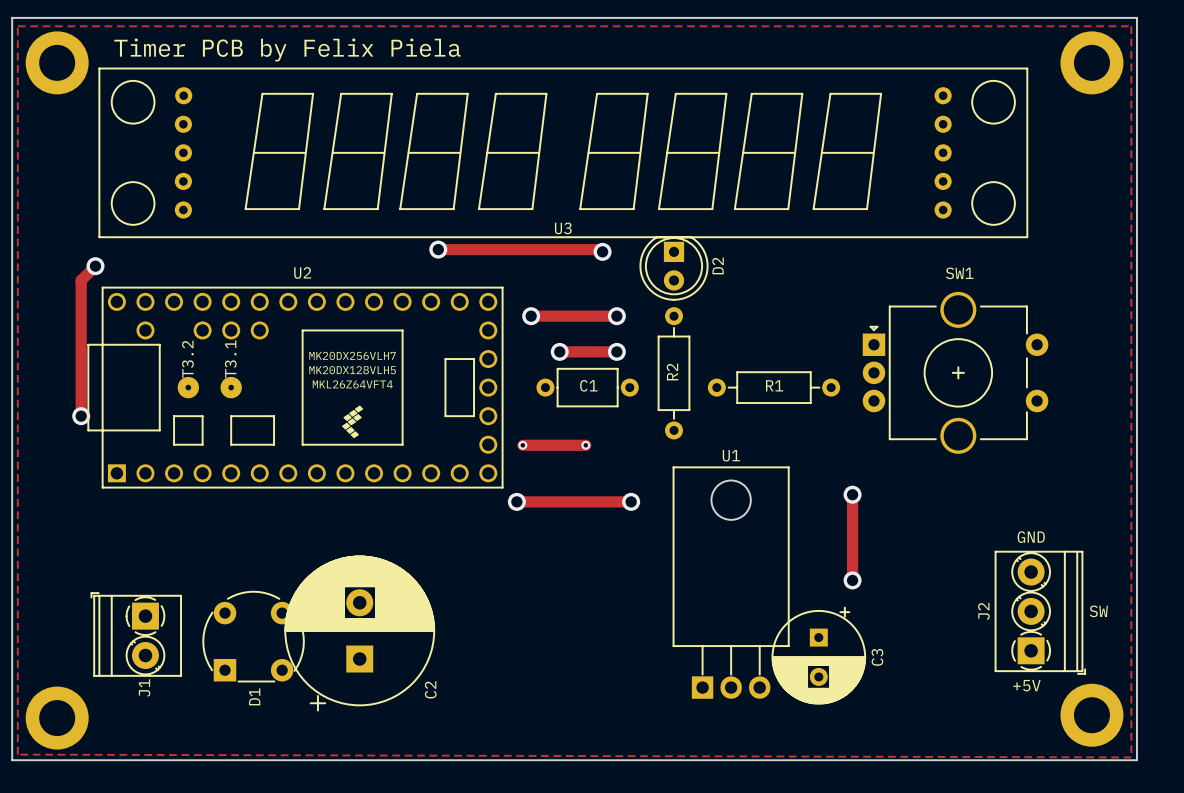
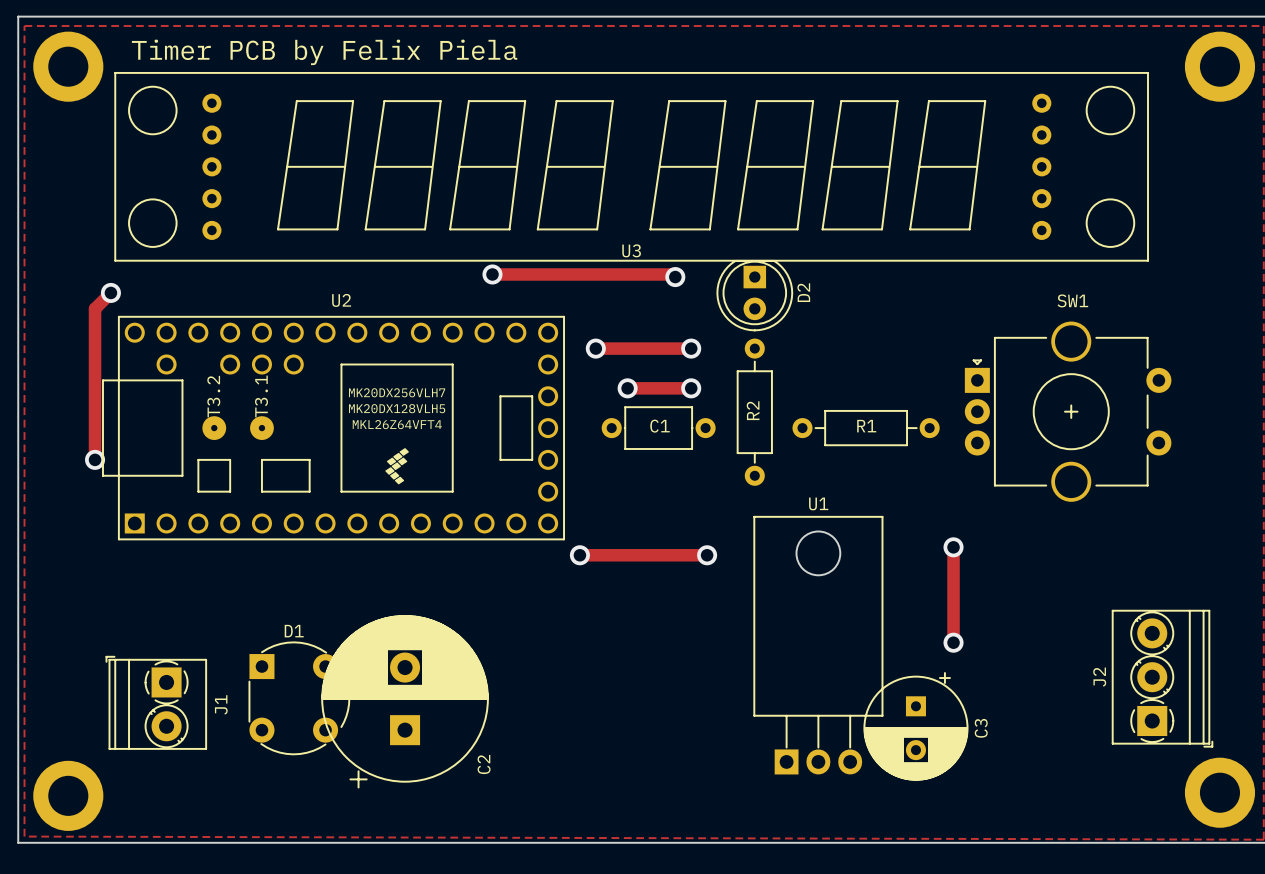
U3 footprint: [98, 67, 1028, 238] -> [114, 72, 1149, 262]
track: (522, 445) (585, 445) -> none
via: (522, 445) -> none
via: (585, 445) -> none
text: GND (1031, 537) -> none
text: SW (1098, 611) -> none
D1 rotation: 0° (253, 636) -> 90° clockwise (299, 698)
text: +5V (1026, 685) -> none
J1 name position: J1 (144, 688) -> J1 (221, 704)
D1 name position: D1 (254, 696) -> D1 (294, 631)

